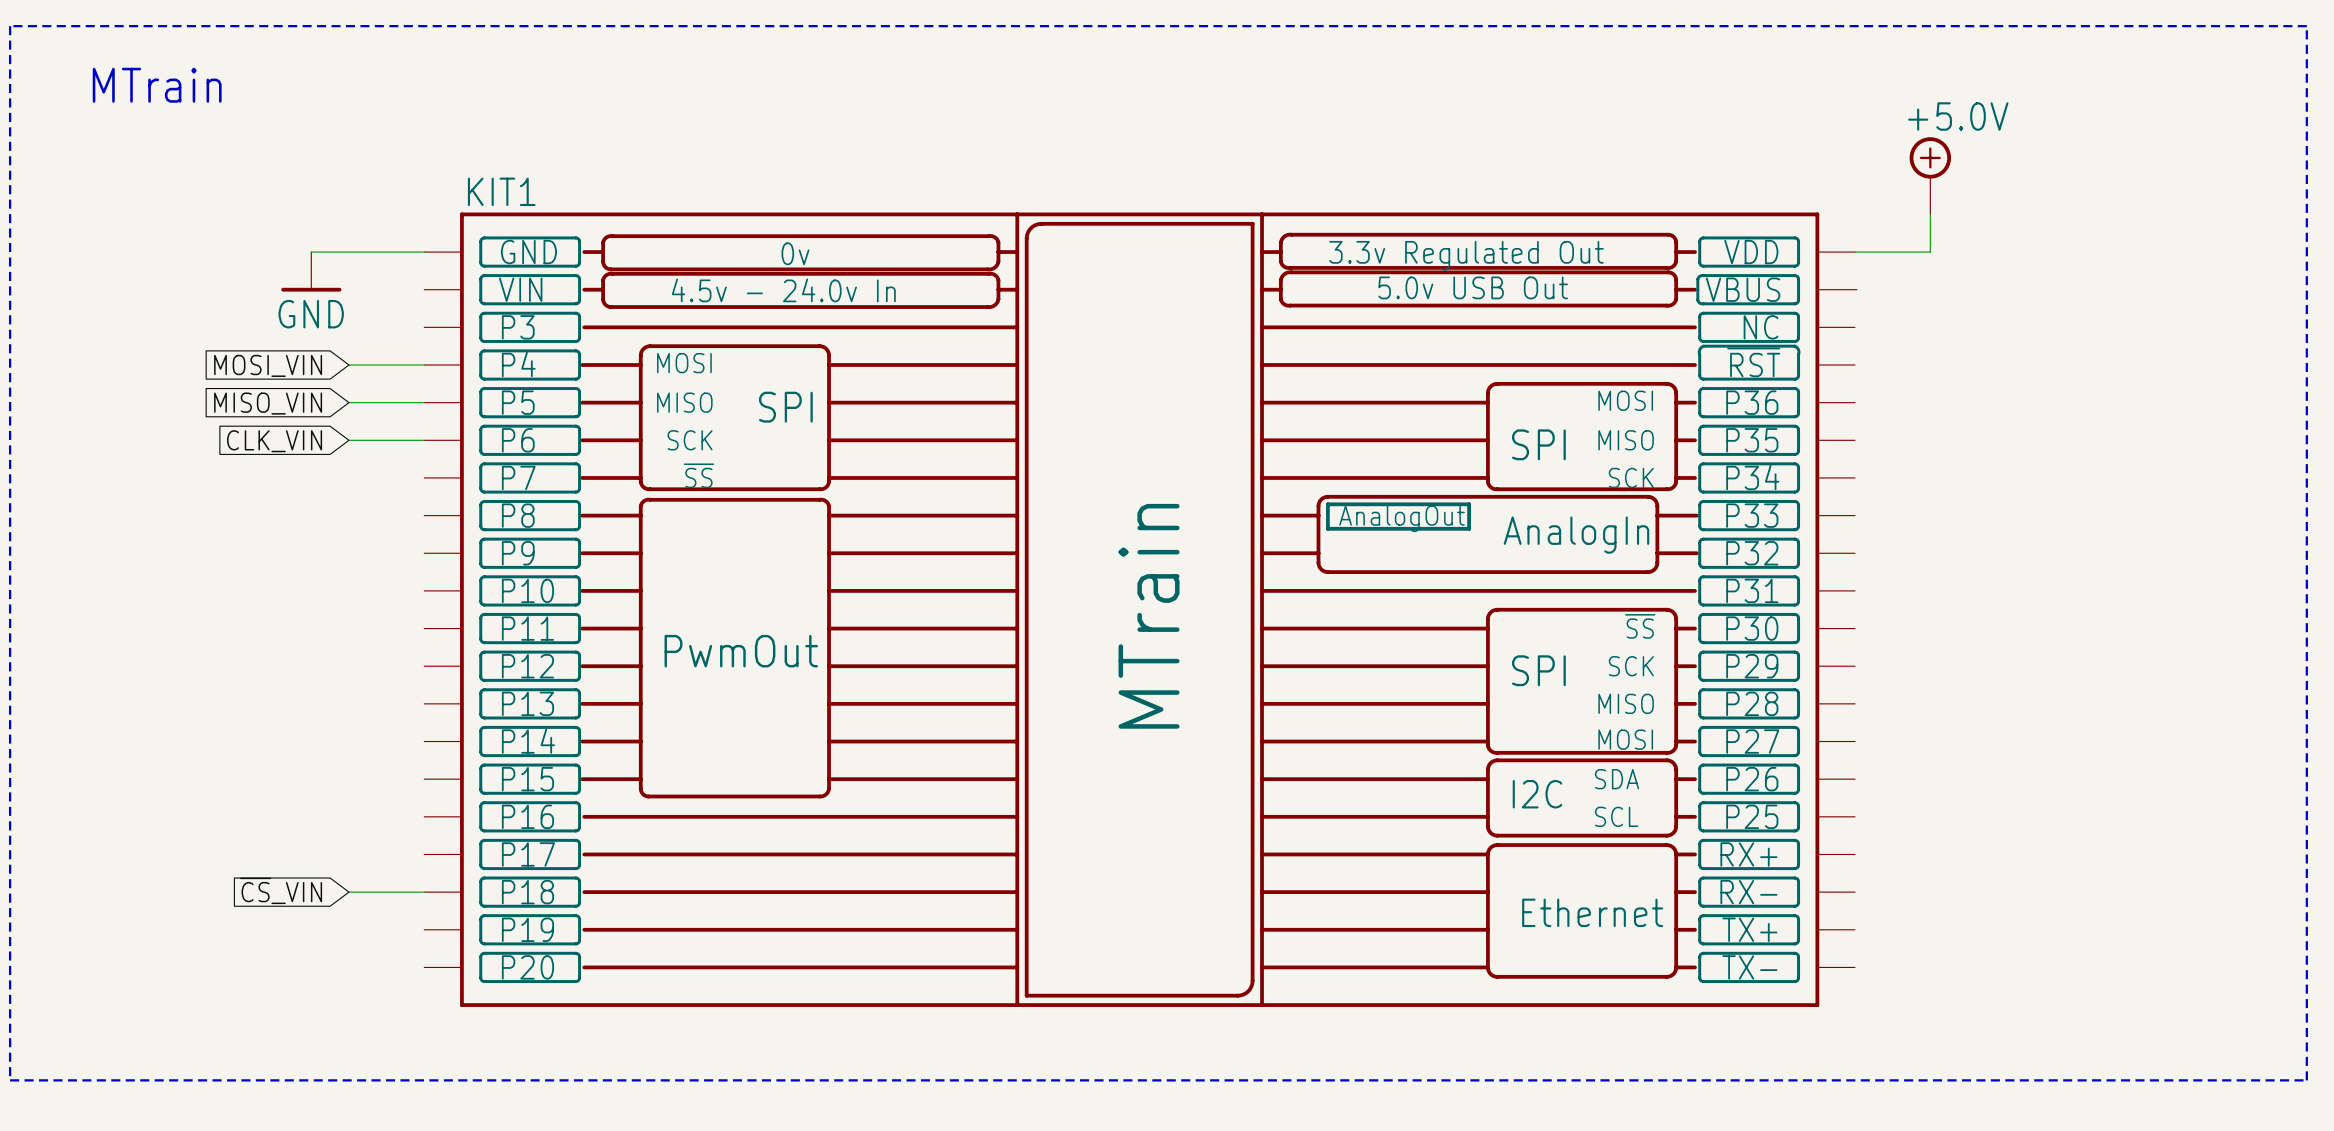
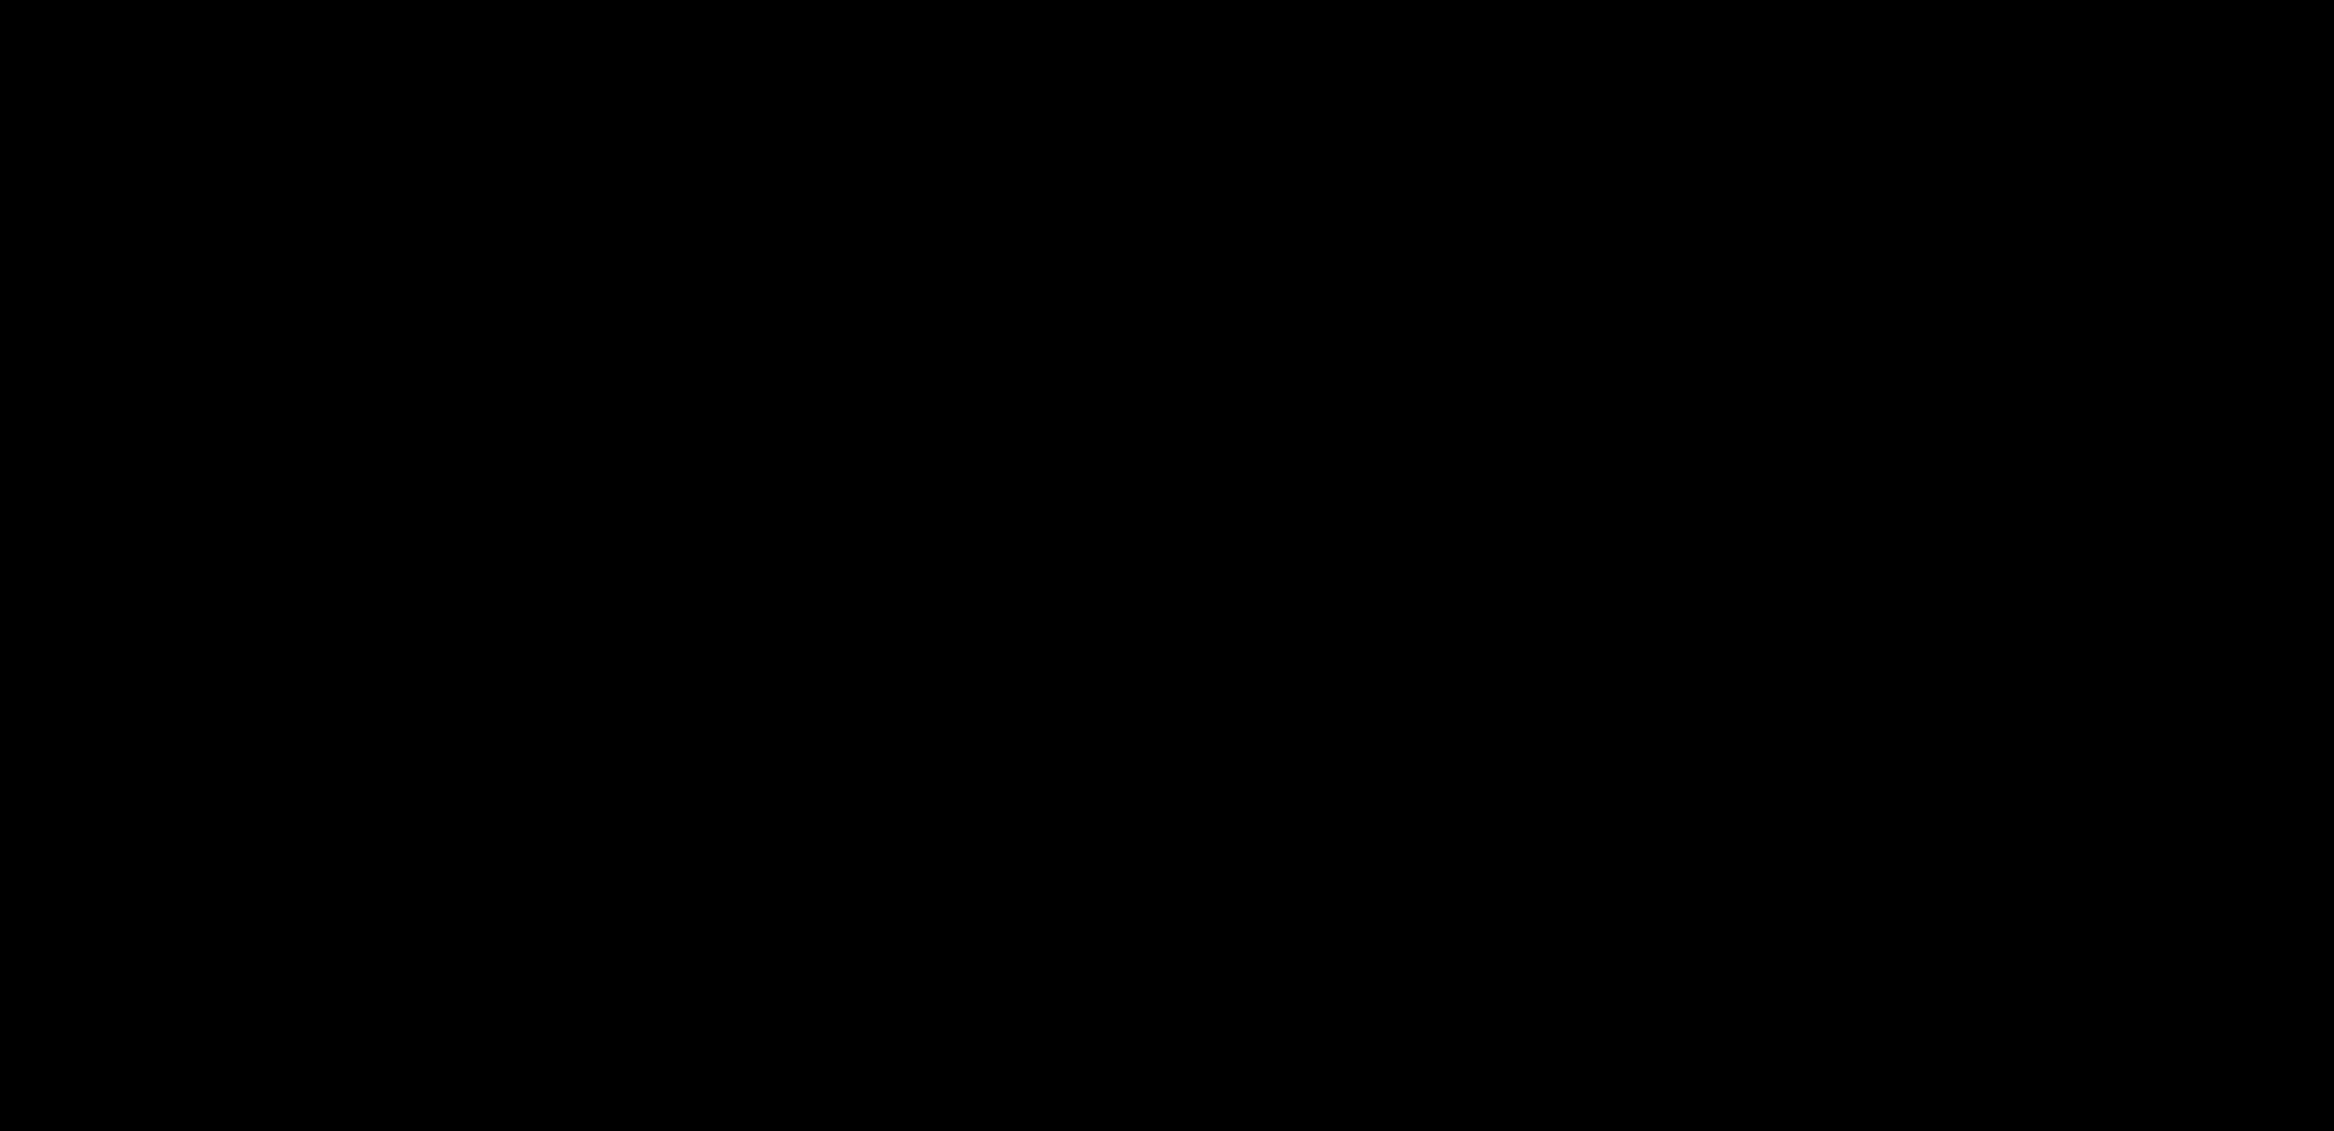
line: (10, 26) (10, 1080) (2306, 1080) (2306, 26) (10, 26) -> none
text: MTrain (157, 85) -> none
power symbol: +5.0V (1930, 175) -> none
wire: (1930, 214) (1930, 252) (1855, 252) -> none
wire: (311, 252) (424, 252) -> none
power symbol: GND (311, 271) -> none
global label: MOSI_VIN (268, 365) -> none
wire: (348, 365) (424, 365) -> none
wire: (348, 402) (424, 402) -> none
global label: MISO_VIN (268, 403) -> none
wire: (348, 440) (424, 440) -> none
global label: CLK_VIN (274, 441) -> none
KIT1: (1140, 609) -> none
global label: ~{CS}_VIN (281, 890) -> none
wire: (348, 892) (424, 892) -> none

